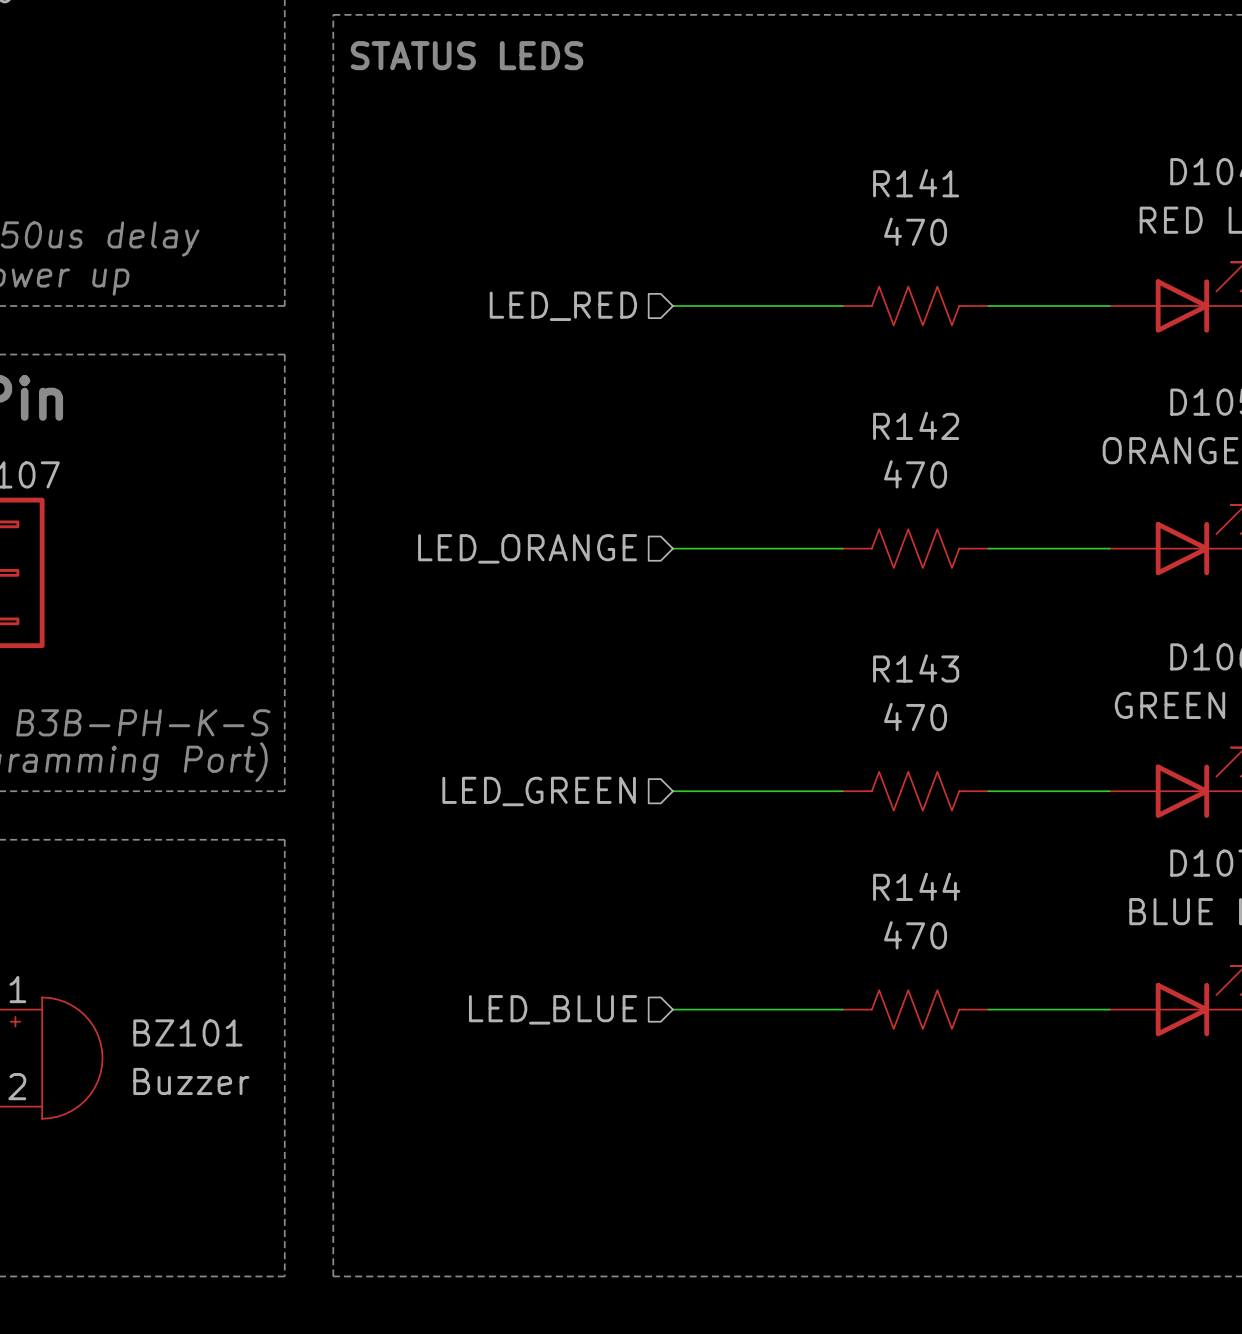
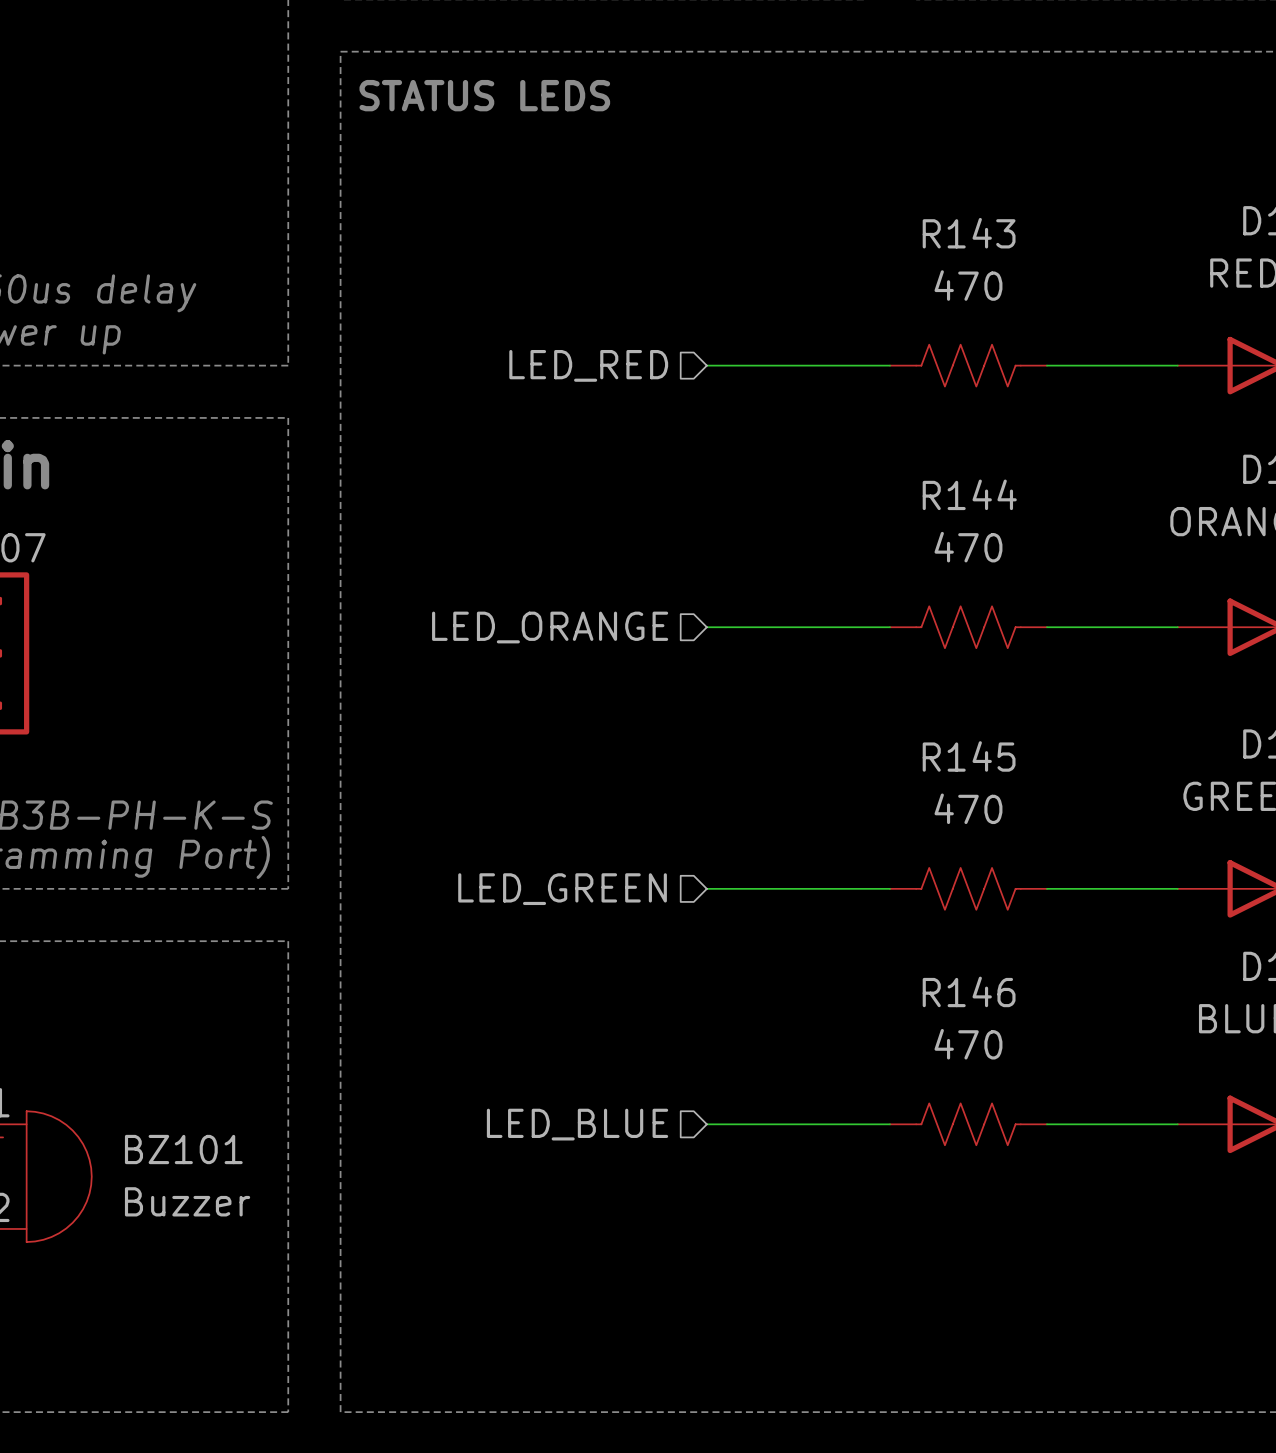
R141 name: R141 (916, 183) -> R143 (969, 233)
R142 name: R142 (916, 425) -> R144 (969, 494)
R143 name: R143 (916, 668) -> R145 (969, 756)
R144 name: R144 (916, 886) -> R146 (969, 991)

